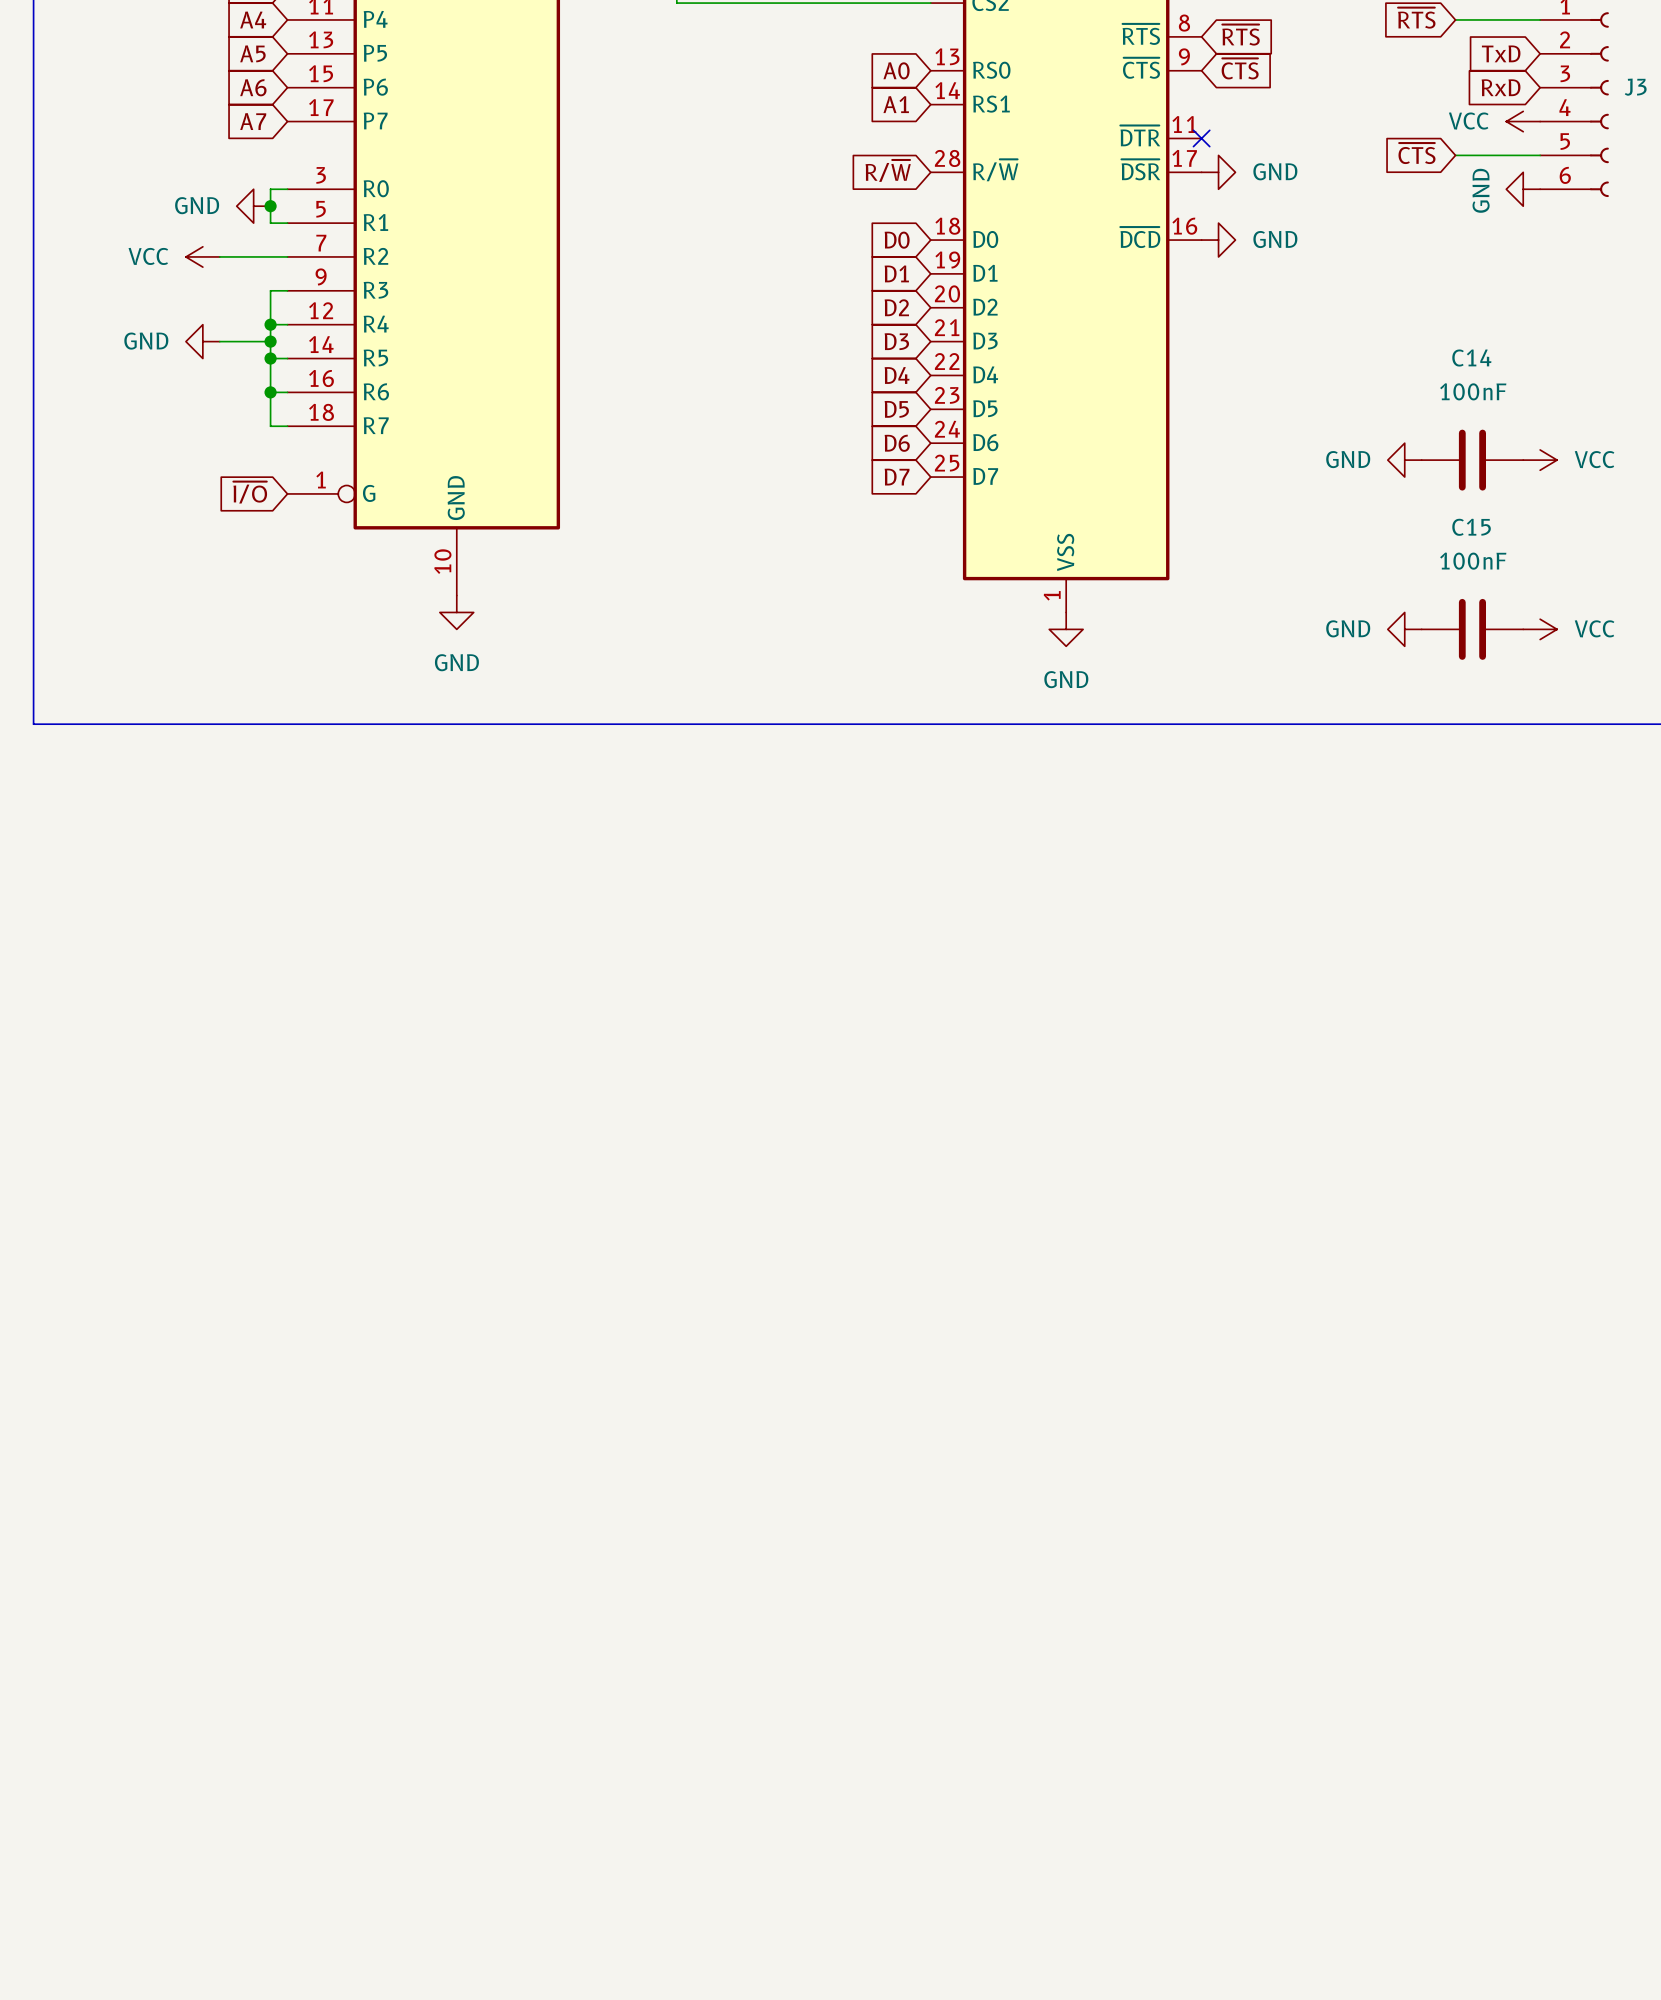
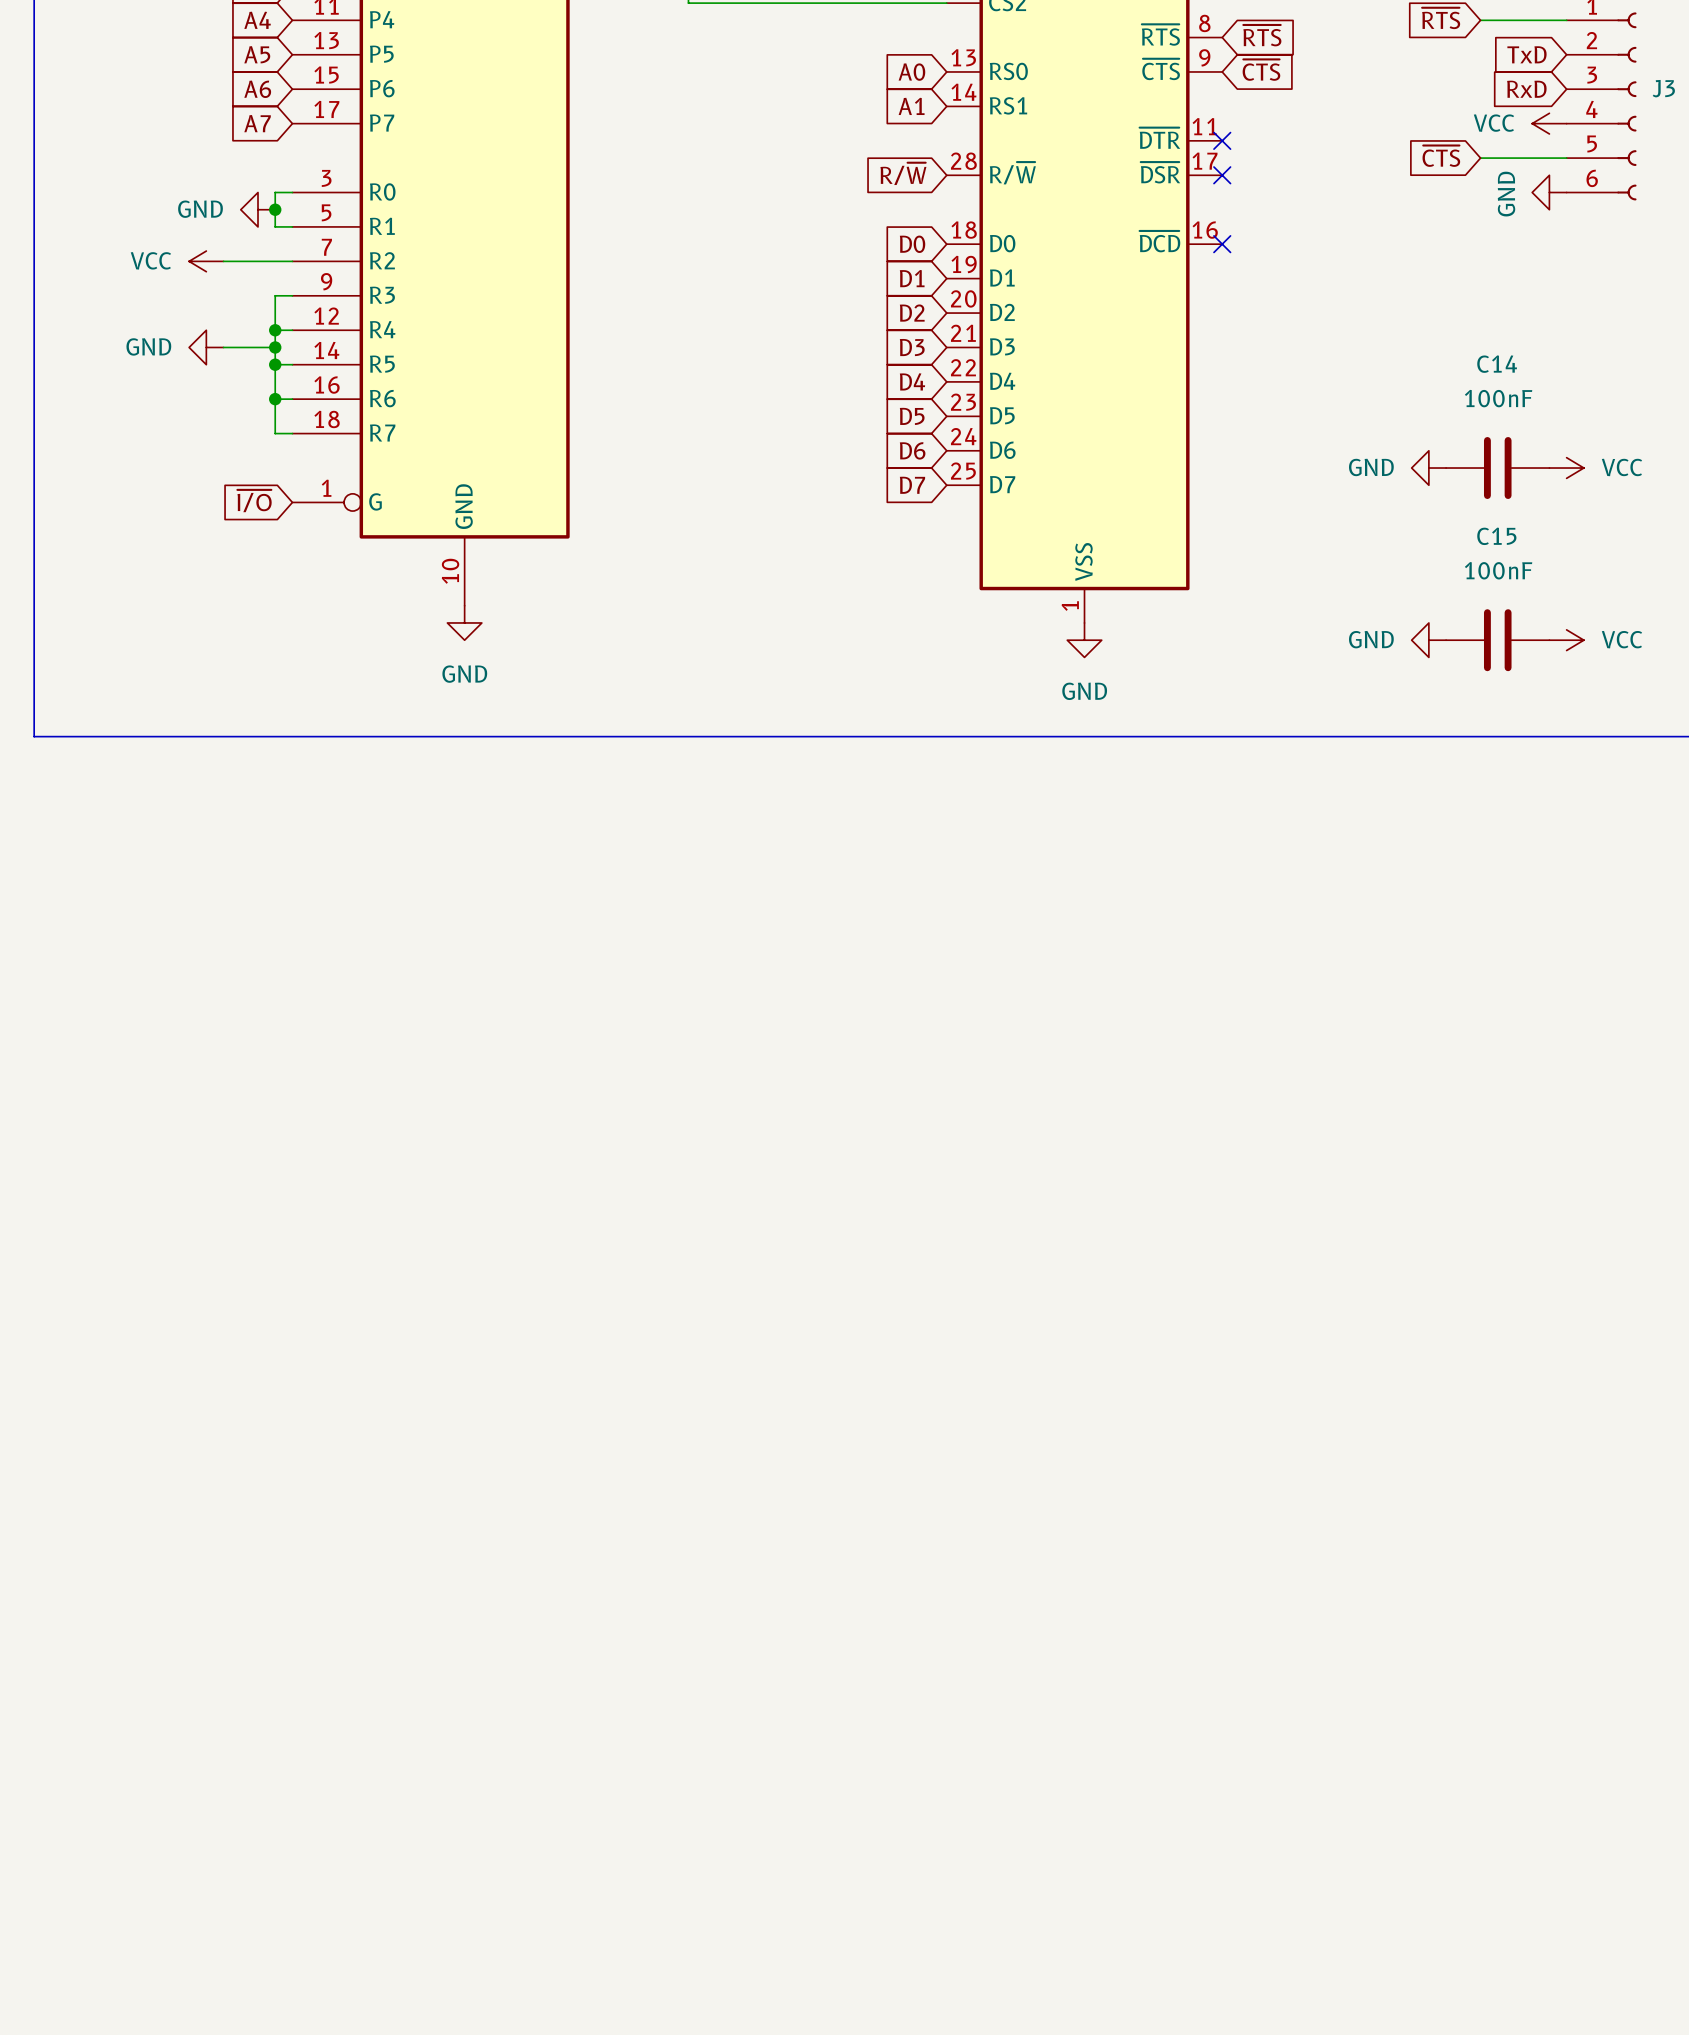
no-connect mark: none -> (1222, 175)
power symbol: GND (1218, 172) -> none
no-connect mark: none -> (1222, 244)
power symbol: GND (1218, 240) -> none

